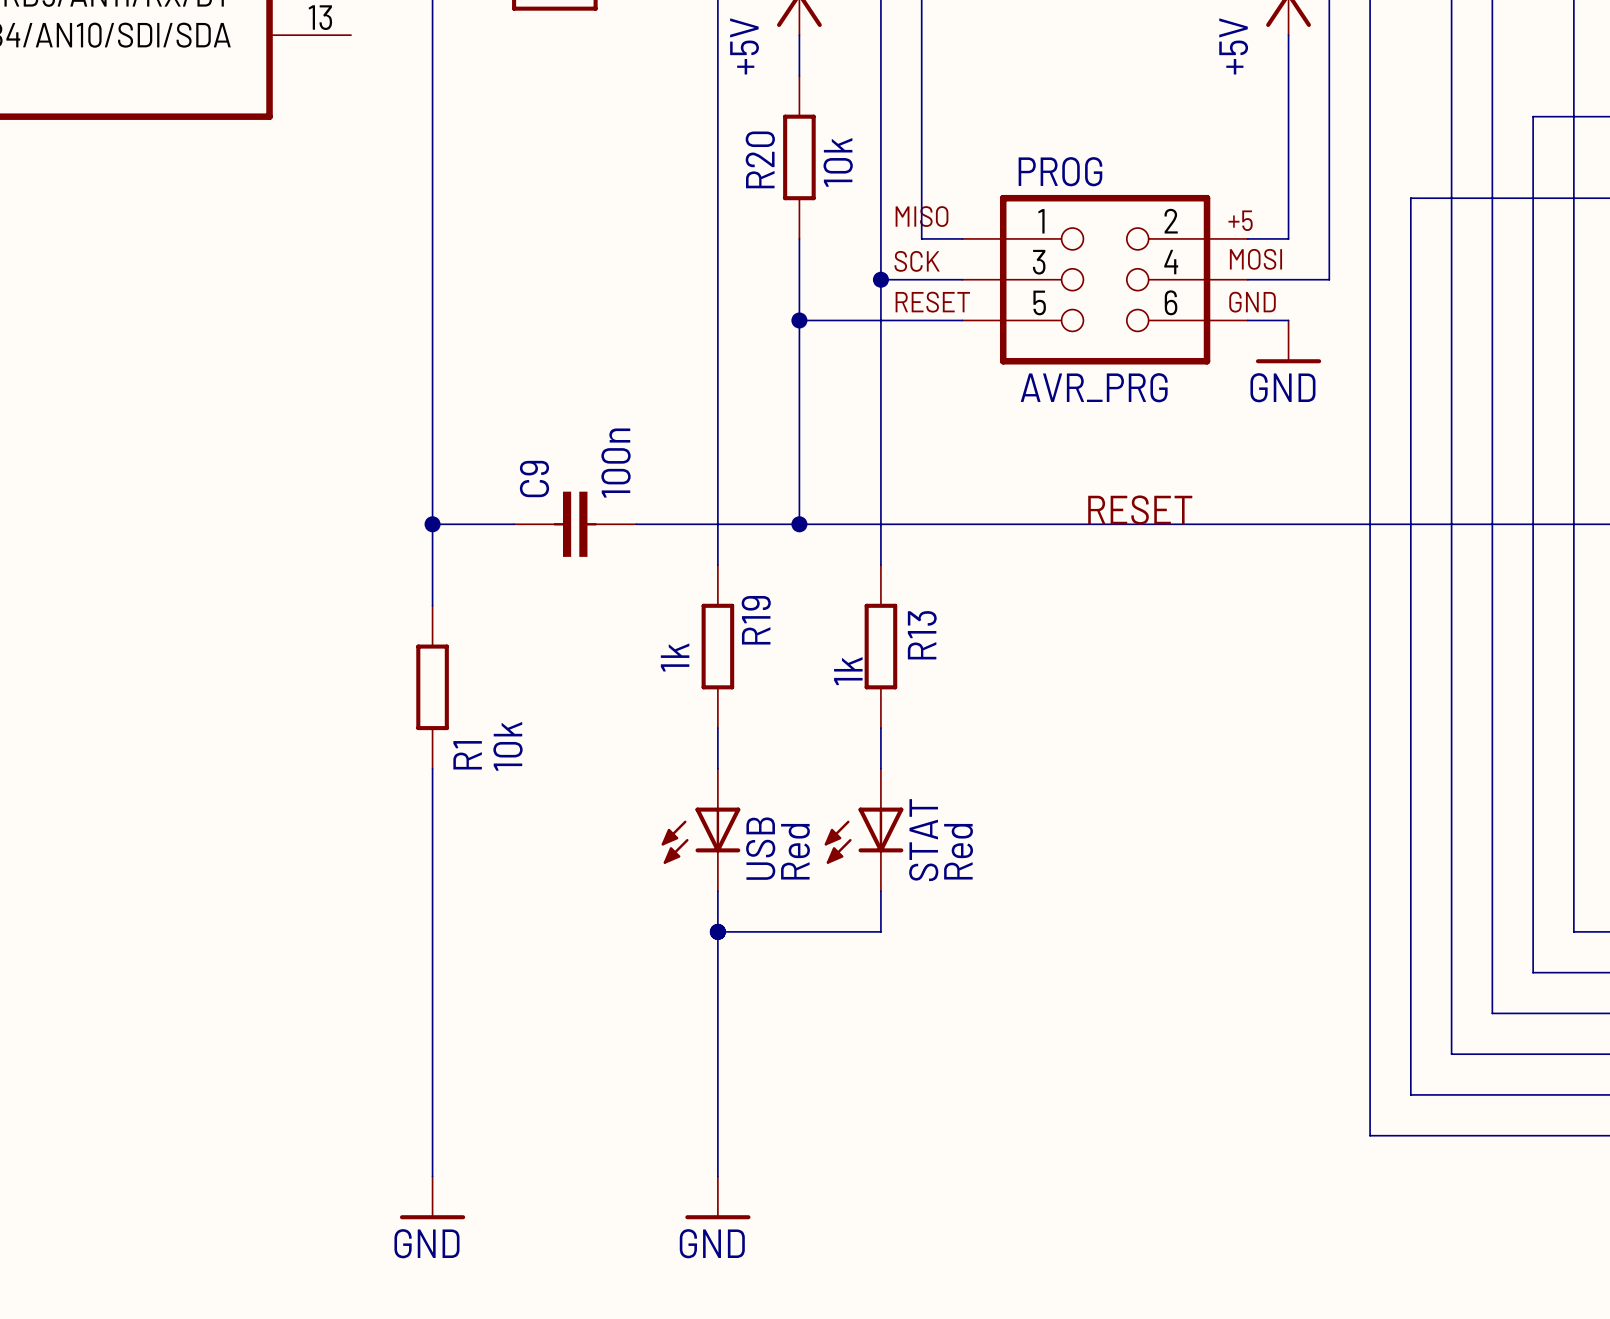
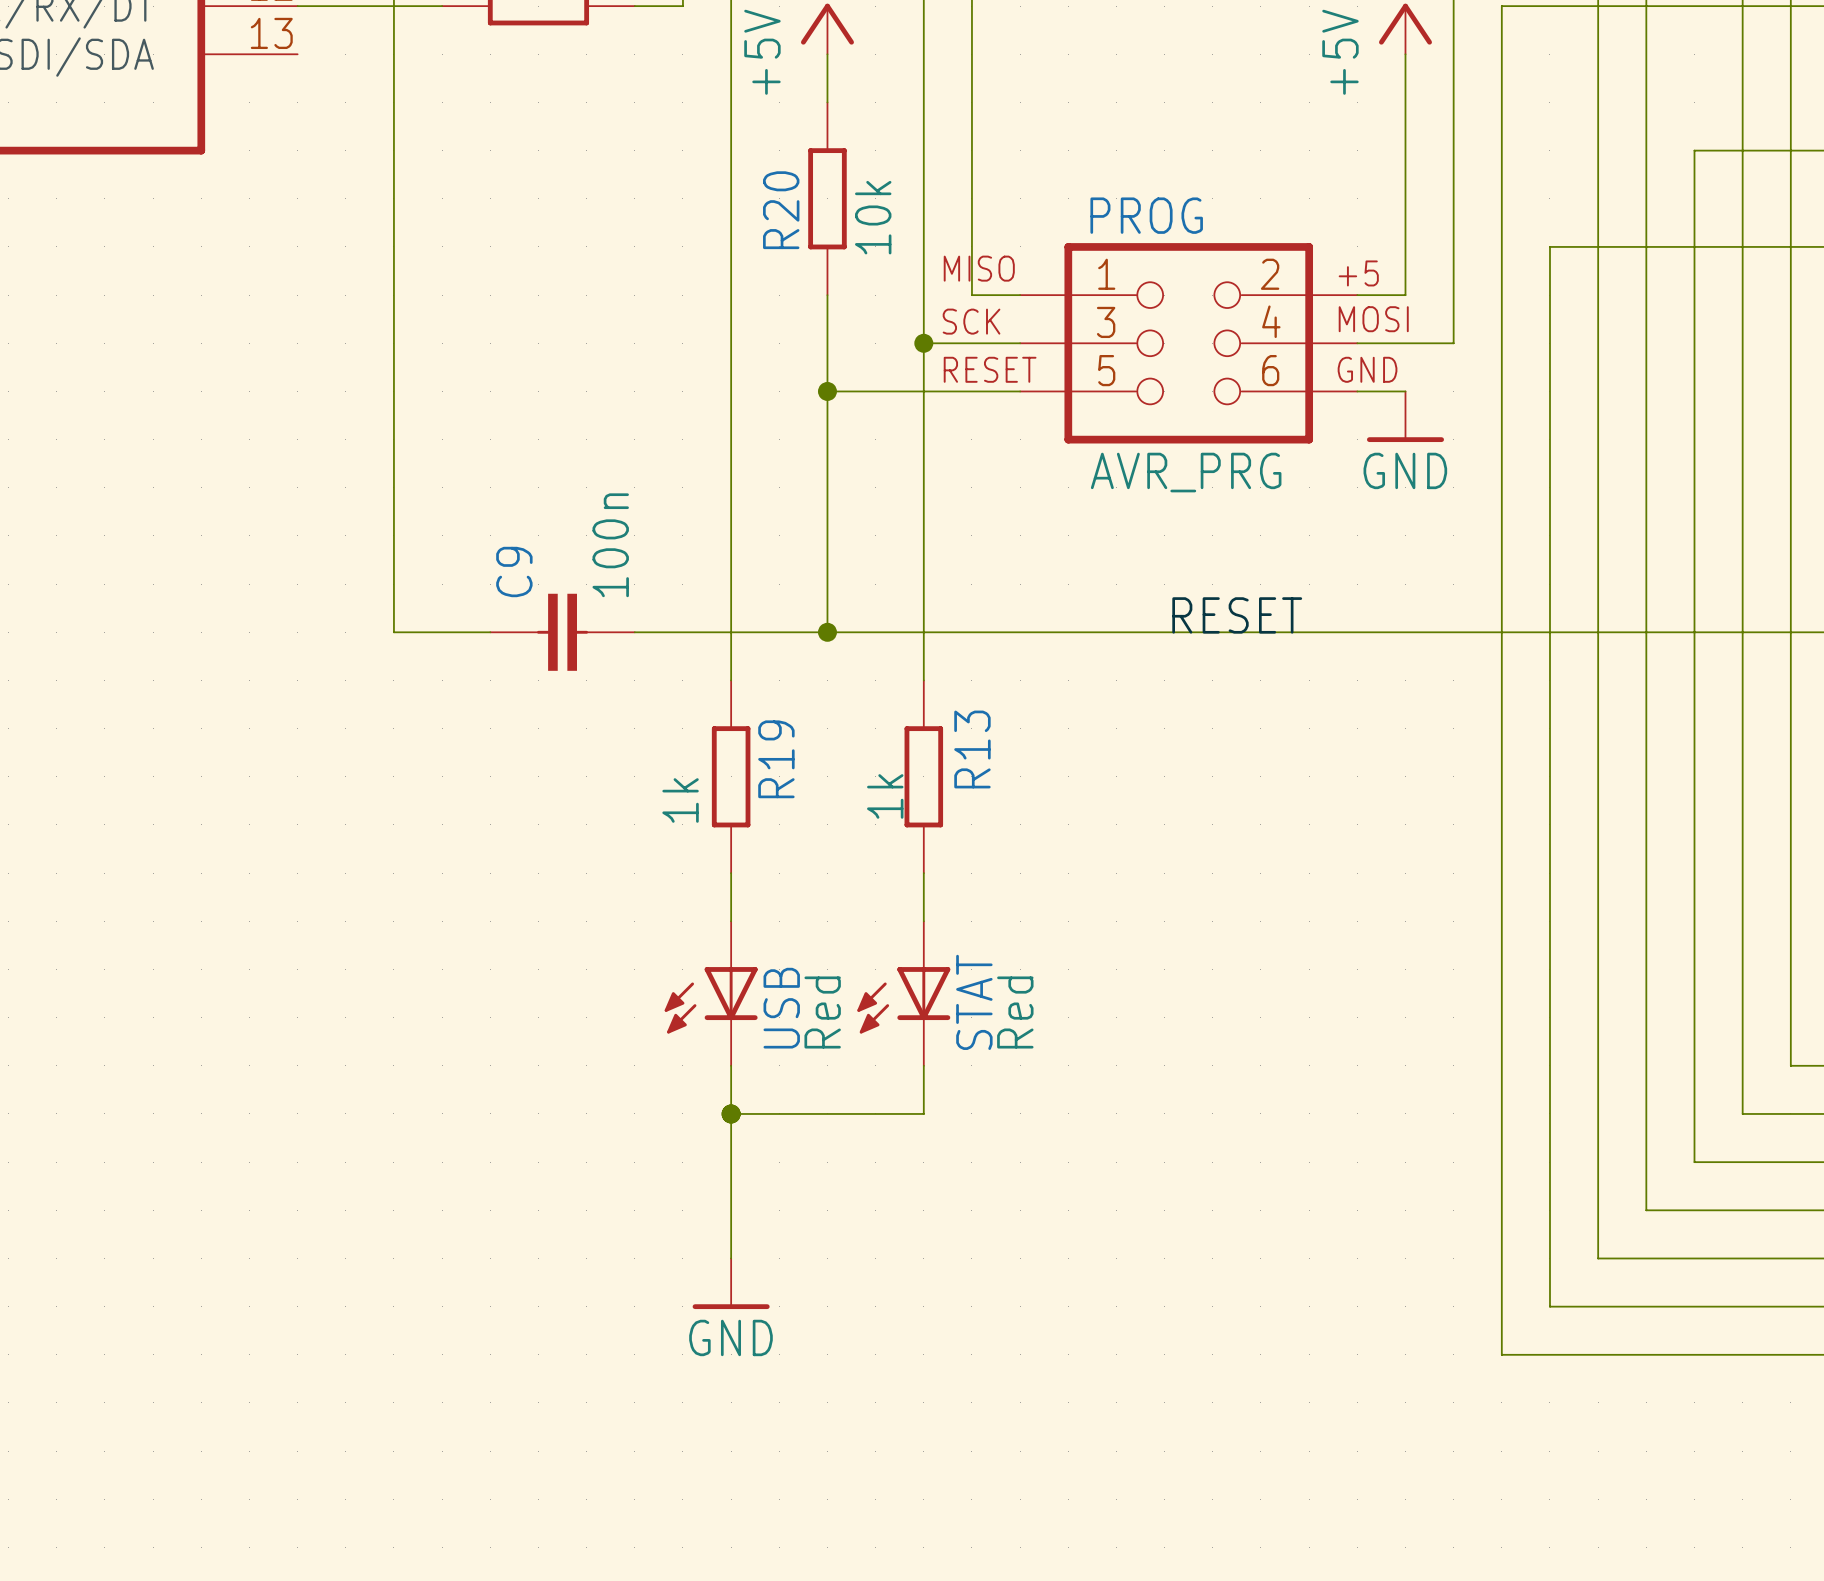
wire: (432, 524) (432, 605) -> none
junction: (432, 524) -> none
R1: 10k (432, 687) -> none
wire: (432, 768) (432, 1176) -> none
wire: (717, 1054) (717, 1176) -> none
power symbol: GND (432, 1197) -> none
power symbol position: GND (717, 1197) -> GND (731, 1283)

